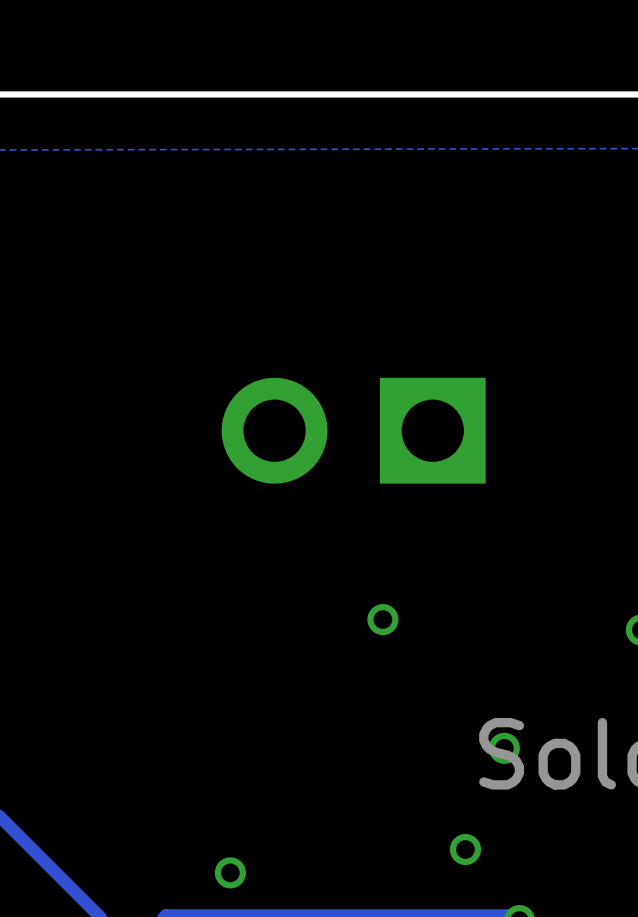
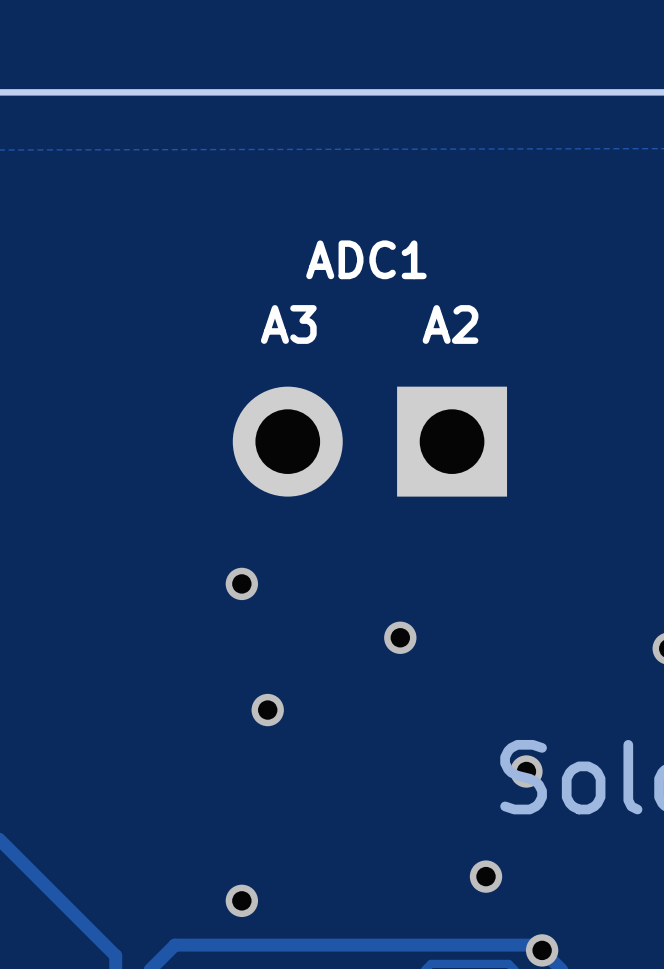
text: none -> ADC1 (366, 259)
text: none -> A3 (288, 324)
text: none -> A2 (450, 324)
via: none -> (241, 583)
via: none -> (267, 710)

